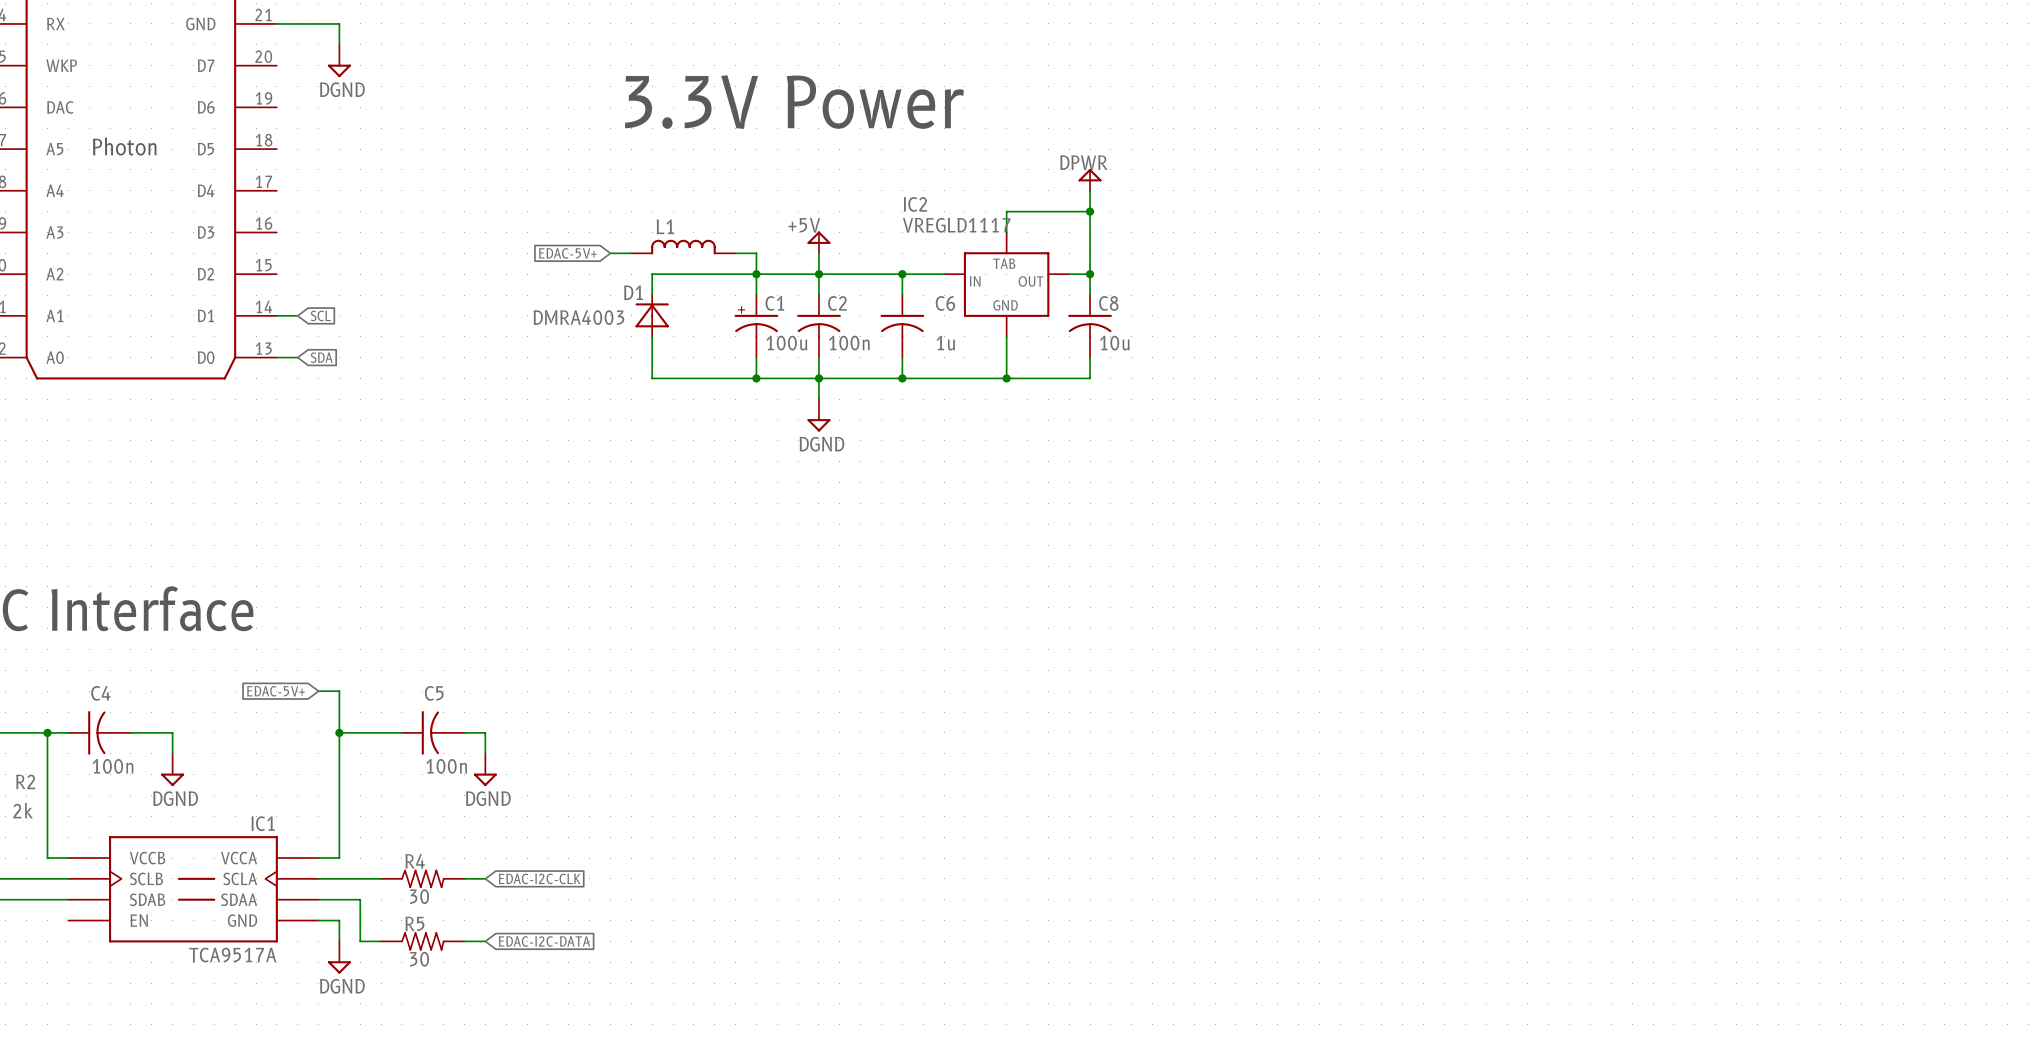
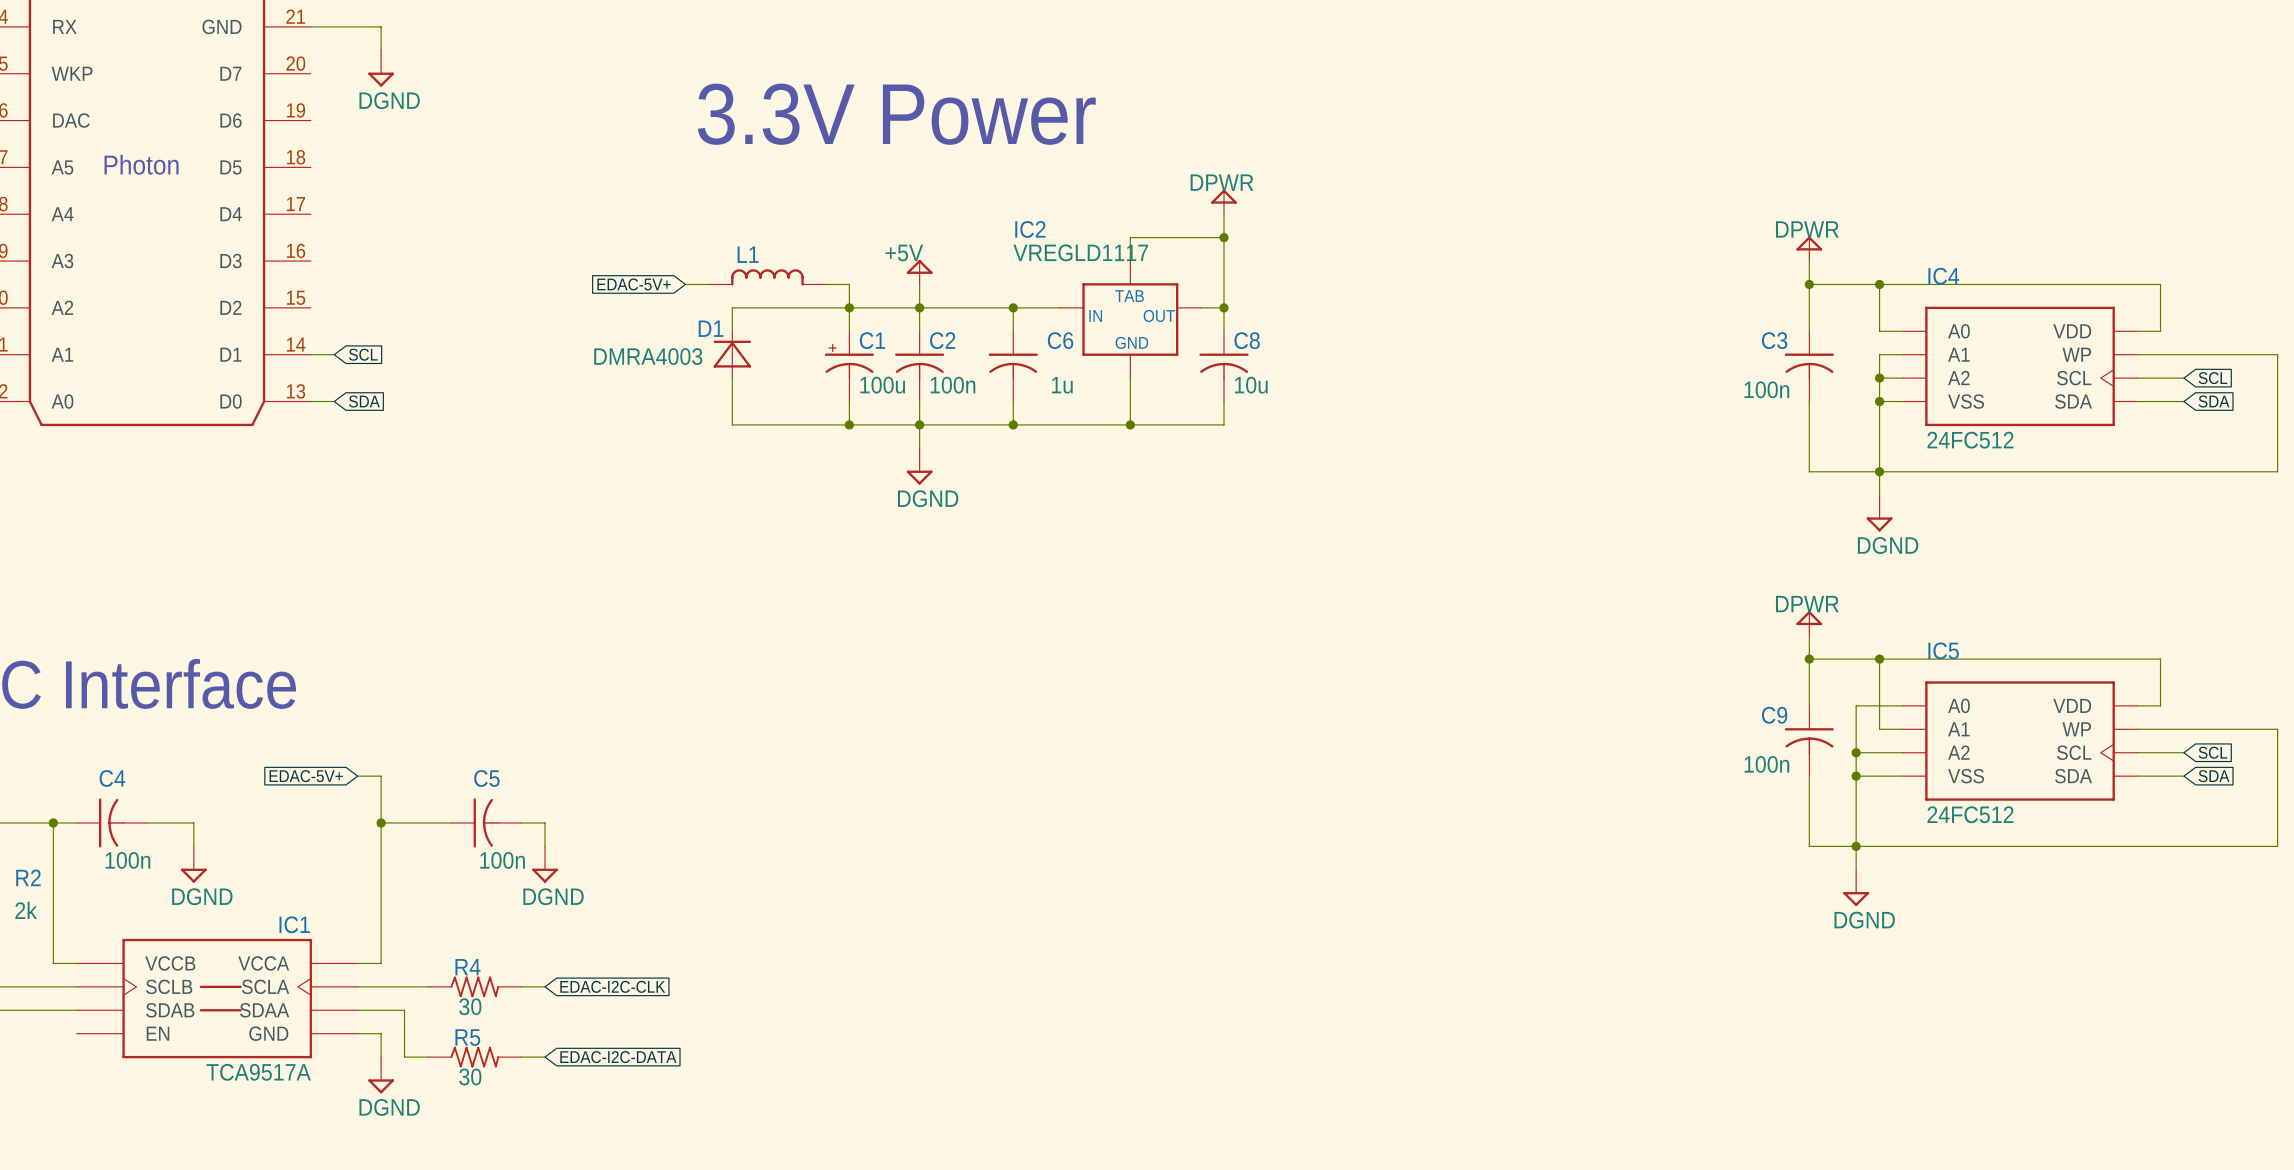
power symbol: none -> DPWR (1809, 248)
wire: none -> (1809, 261) (1809, 331)
wire: none -> (1809, 284) (2160, 284) (2160, 331) (2137, 331)
junction: none -> (1809, 284)
wire: none -> (1879, 284) (1879, 331) (1902, 331)
junction: none -> (1879, 284)
wire: none -> (1902, 354) (1879, 354) (1879, 495)
wire: none -> (2137, 354) (2277, 354) (2277, 471) (1809, 471) (1809, 401)
C3: none -> 100n (1809, 366)
IC4: none -> 24FC512 (2020, 366)
wire: none -> (1879, 378) (1902, 378)
junction: none -> (1879, 378)
wire: none -> (2137, 378) (2183, 378)
global label: none -> SCL (2212, 378)
wire: none -> (1879, 401) (1902, 401)
junction: none -> (1879, 401)
wire: none -> (2137, 401) (2183, 401)
global label: none -> SDA (2214, 401)
junction: none -> (1879, 471)
power symbol: none -> DGND (1879, 513)
power symbol: none -> DPWR (1809, 623)
wire: none -> (1809, 635) (1809, 705)
wire: none -> (1809, 659) (2160, 659) (2160, 705) (2137, 705)
junction: none -> (1809, 659)
wire: none -> (1879, 659) (1879, 729) (1902, 729)
junction: none -> (1879, 659)
wire: none -> (1902, 705) (1856, 705) (1856, 869)
wire: none -> (2137, 729) (2277, 729) (2277, 846) (1809, 846) (1809, 776)
C9: none -> 100n (1809, 741)
IC5: none -> 24FC512 (2020, 741)
wire: none -> (1856, 752) (1902, 752)
junction: none -> (1856, 752)
wire: none -> (2137, 752) (2183, 752)
global label: none -> SCL (2212, 752)
wire: none -> (1856, 776) (1902, 776)
junction: none -> (1856, 776)
wire: none -> (2137, 776) (2183, 776)
global label: none -> SDA (2214, 776)
junction: none -> (1856, 846)
power symbol: none -> DGND (1856, 887)

